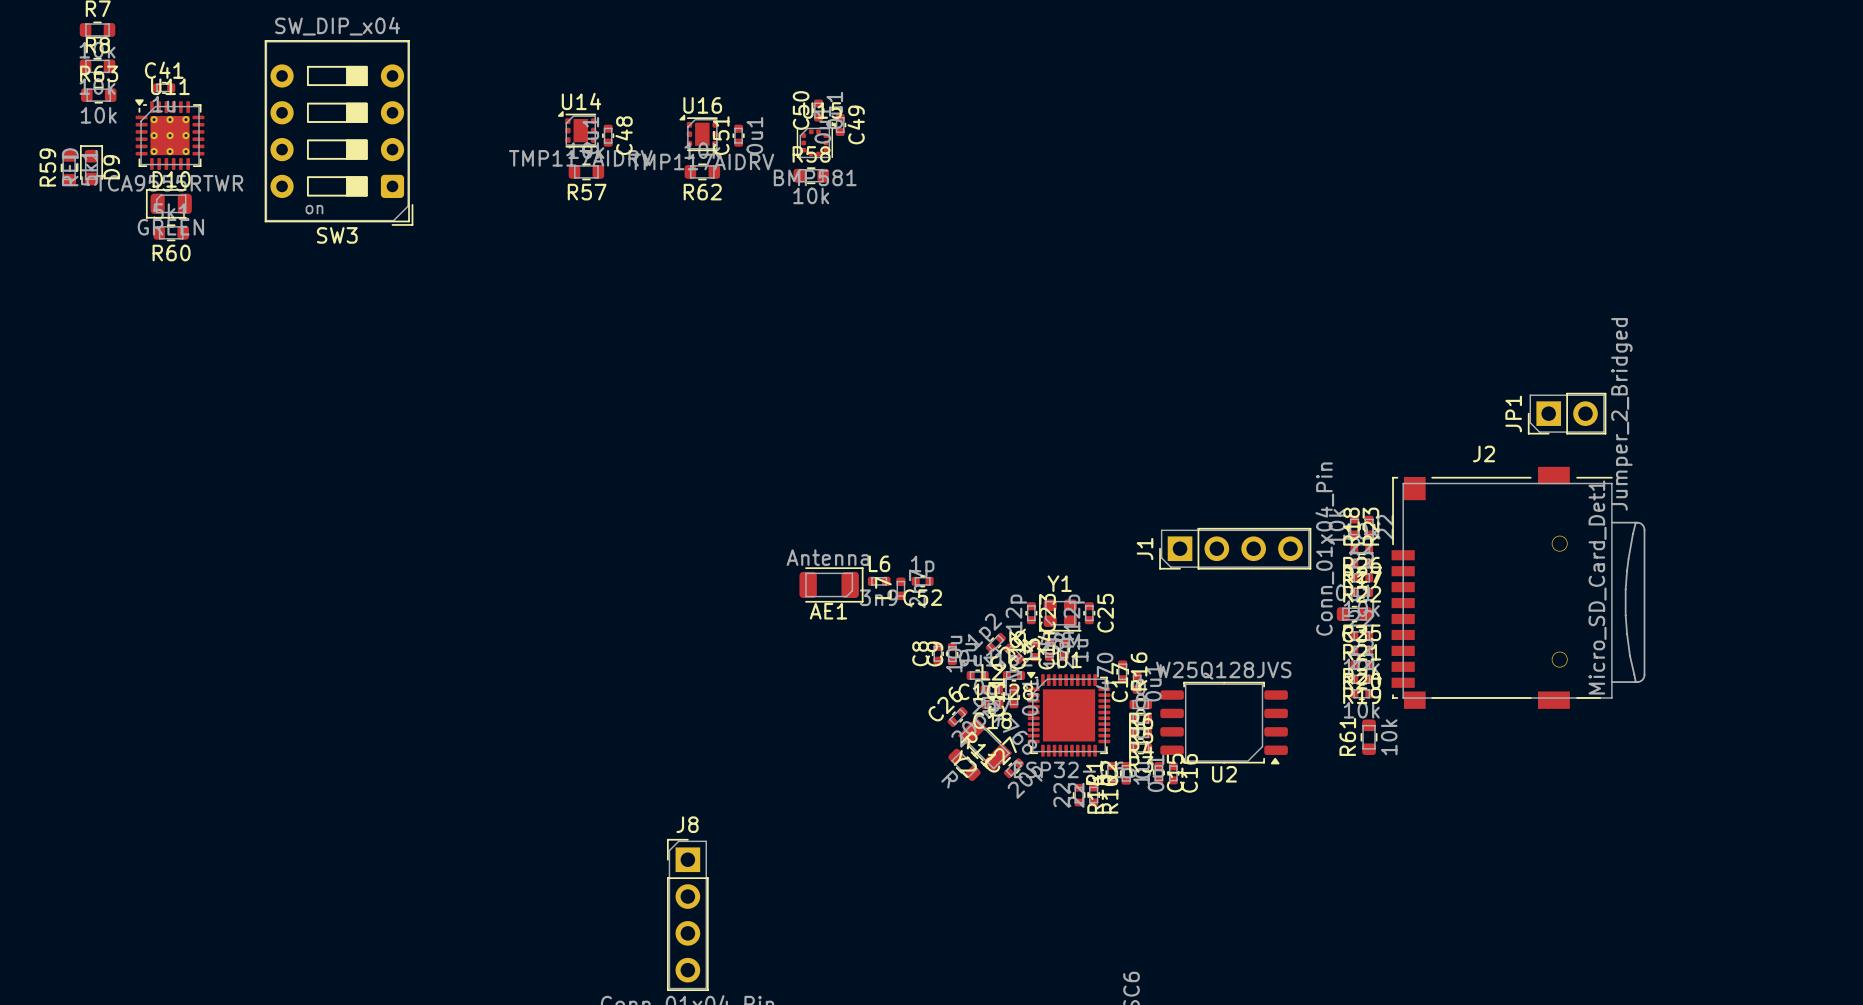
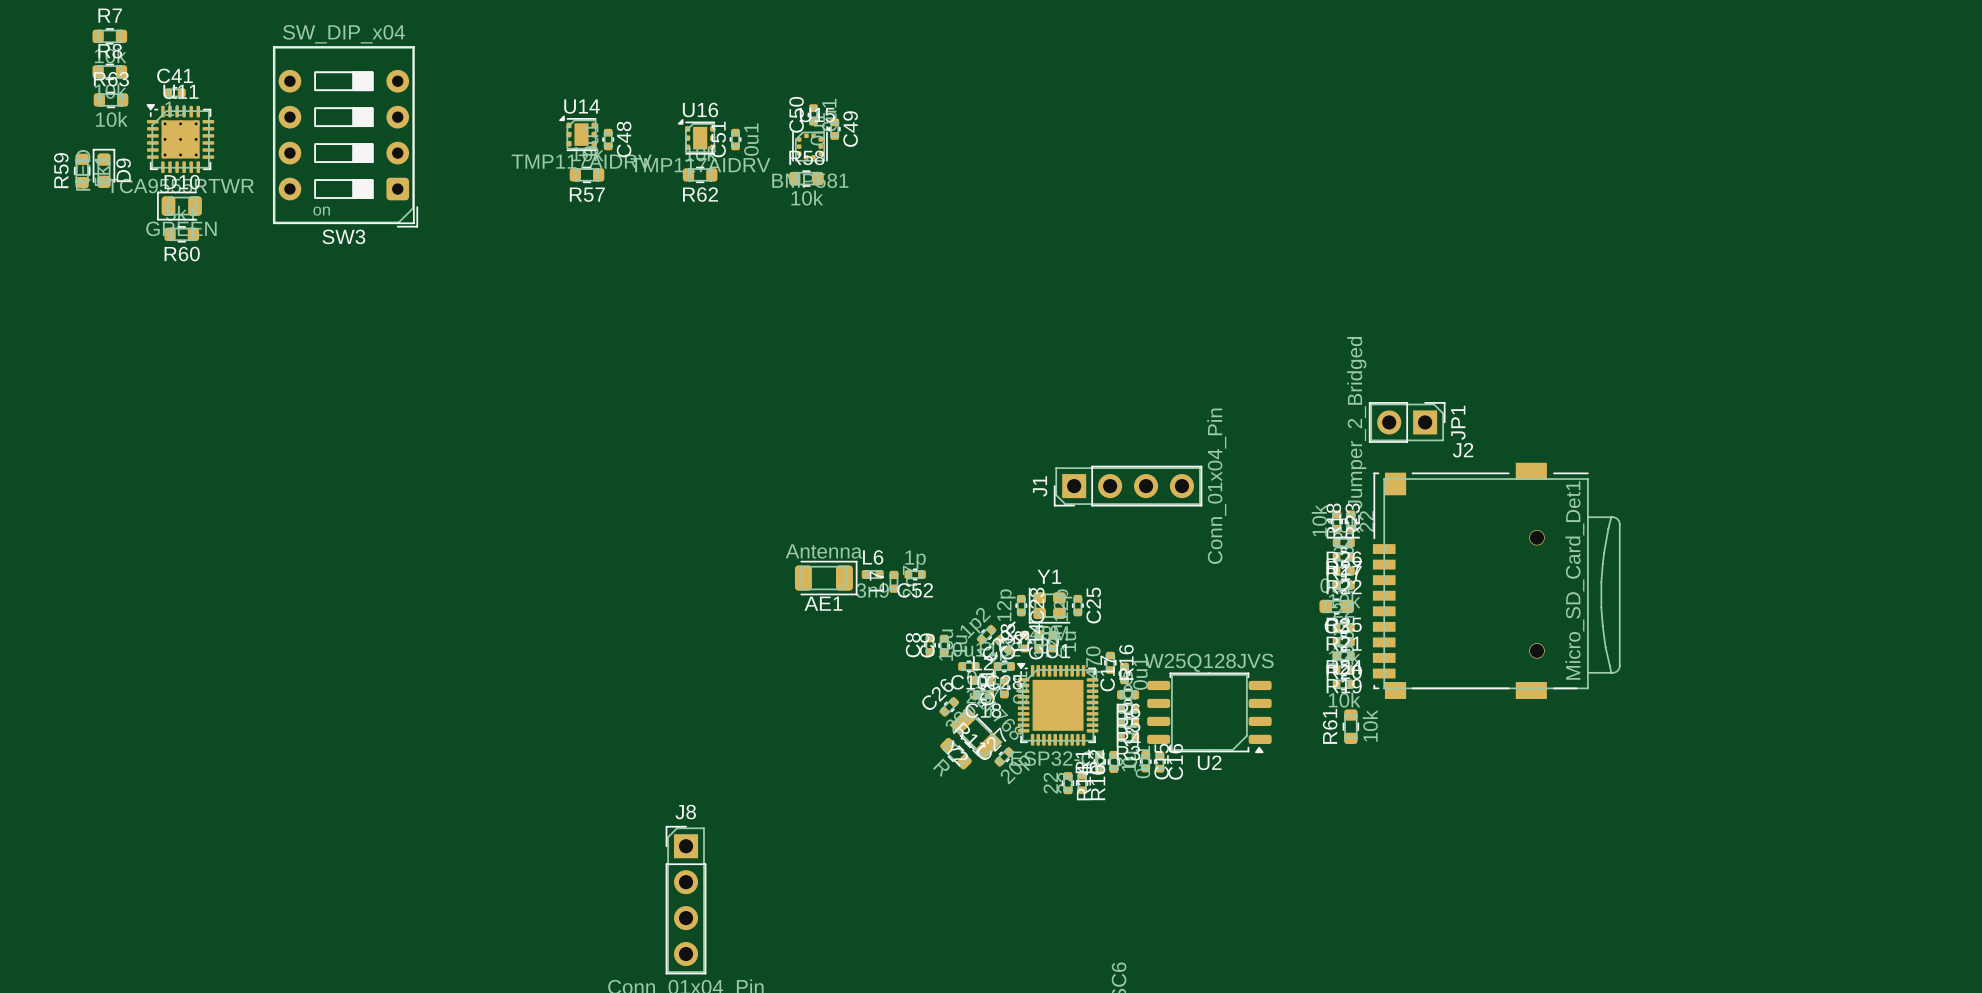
JP1 rotation: 0° (1567, 413) -> 180° (1407, 422)
JP1 position: (1567, 413) -> (1407, 422)
J1 position: (1235, 548) -> (1128, 486)

